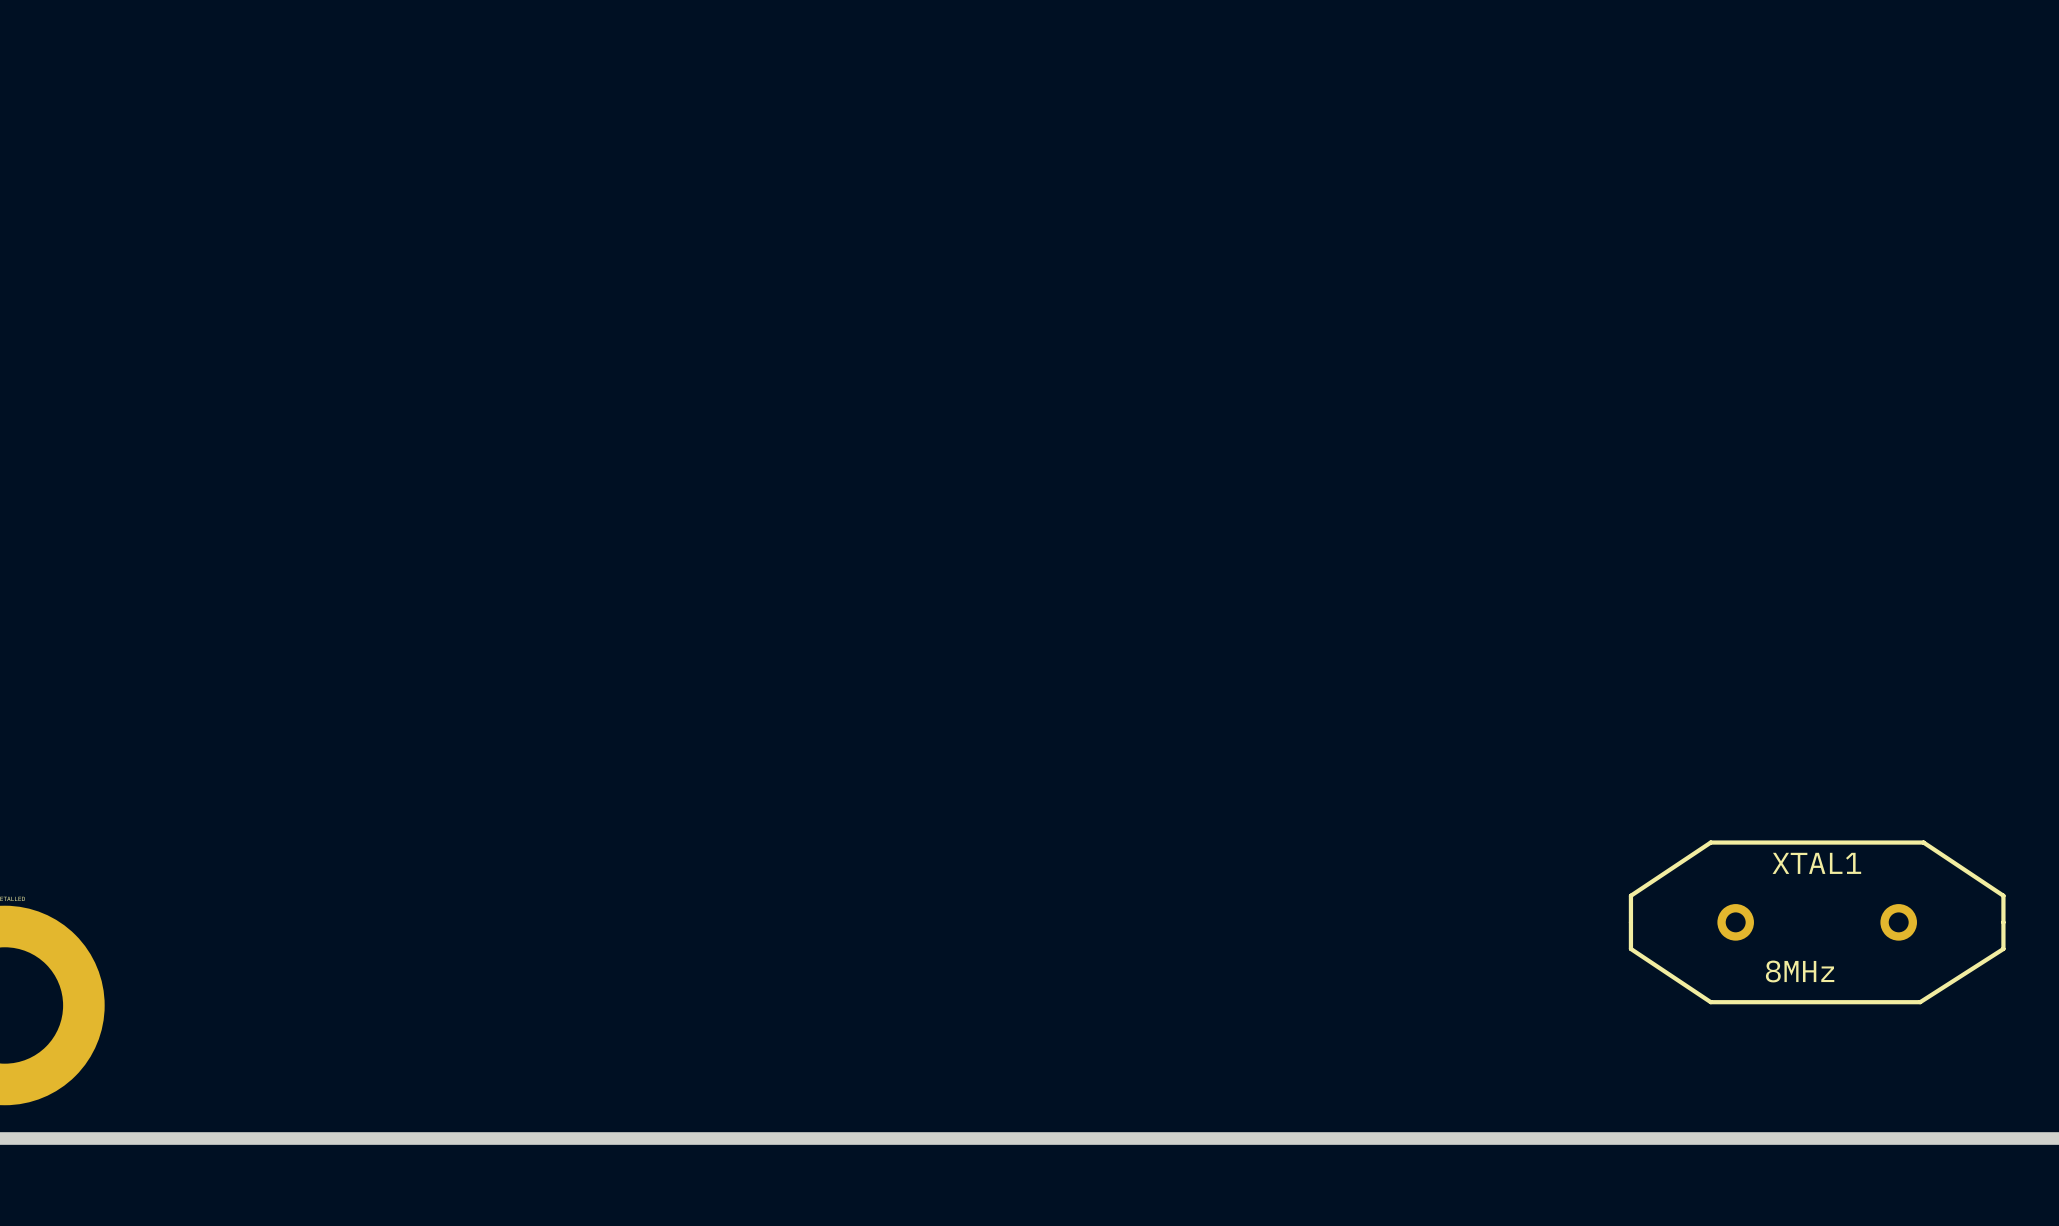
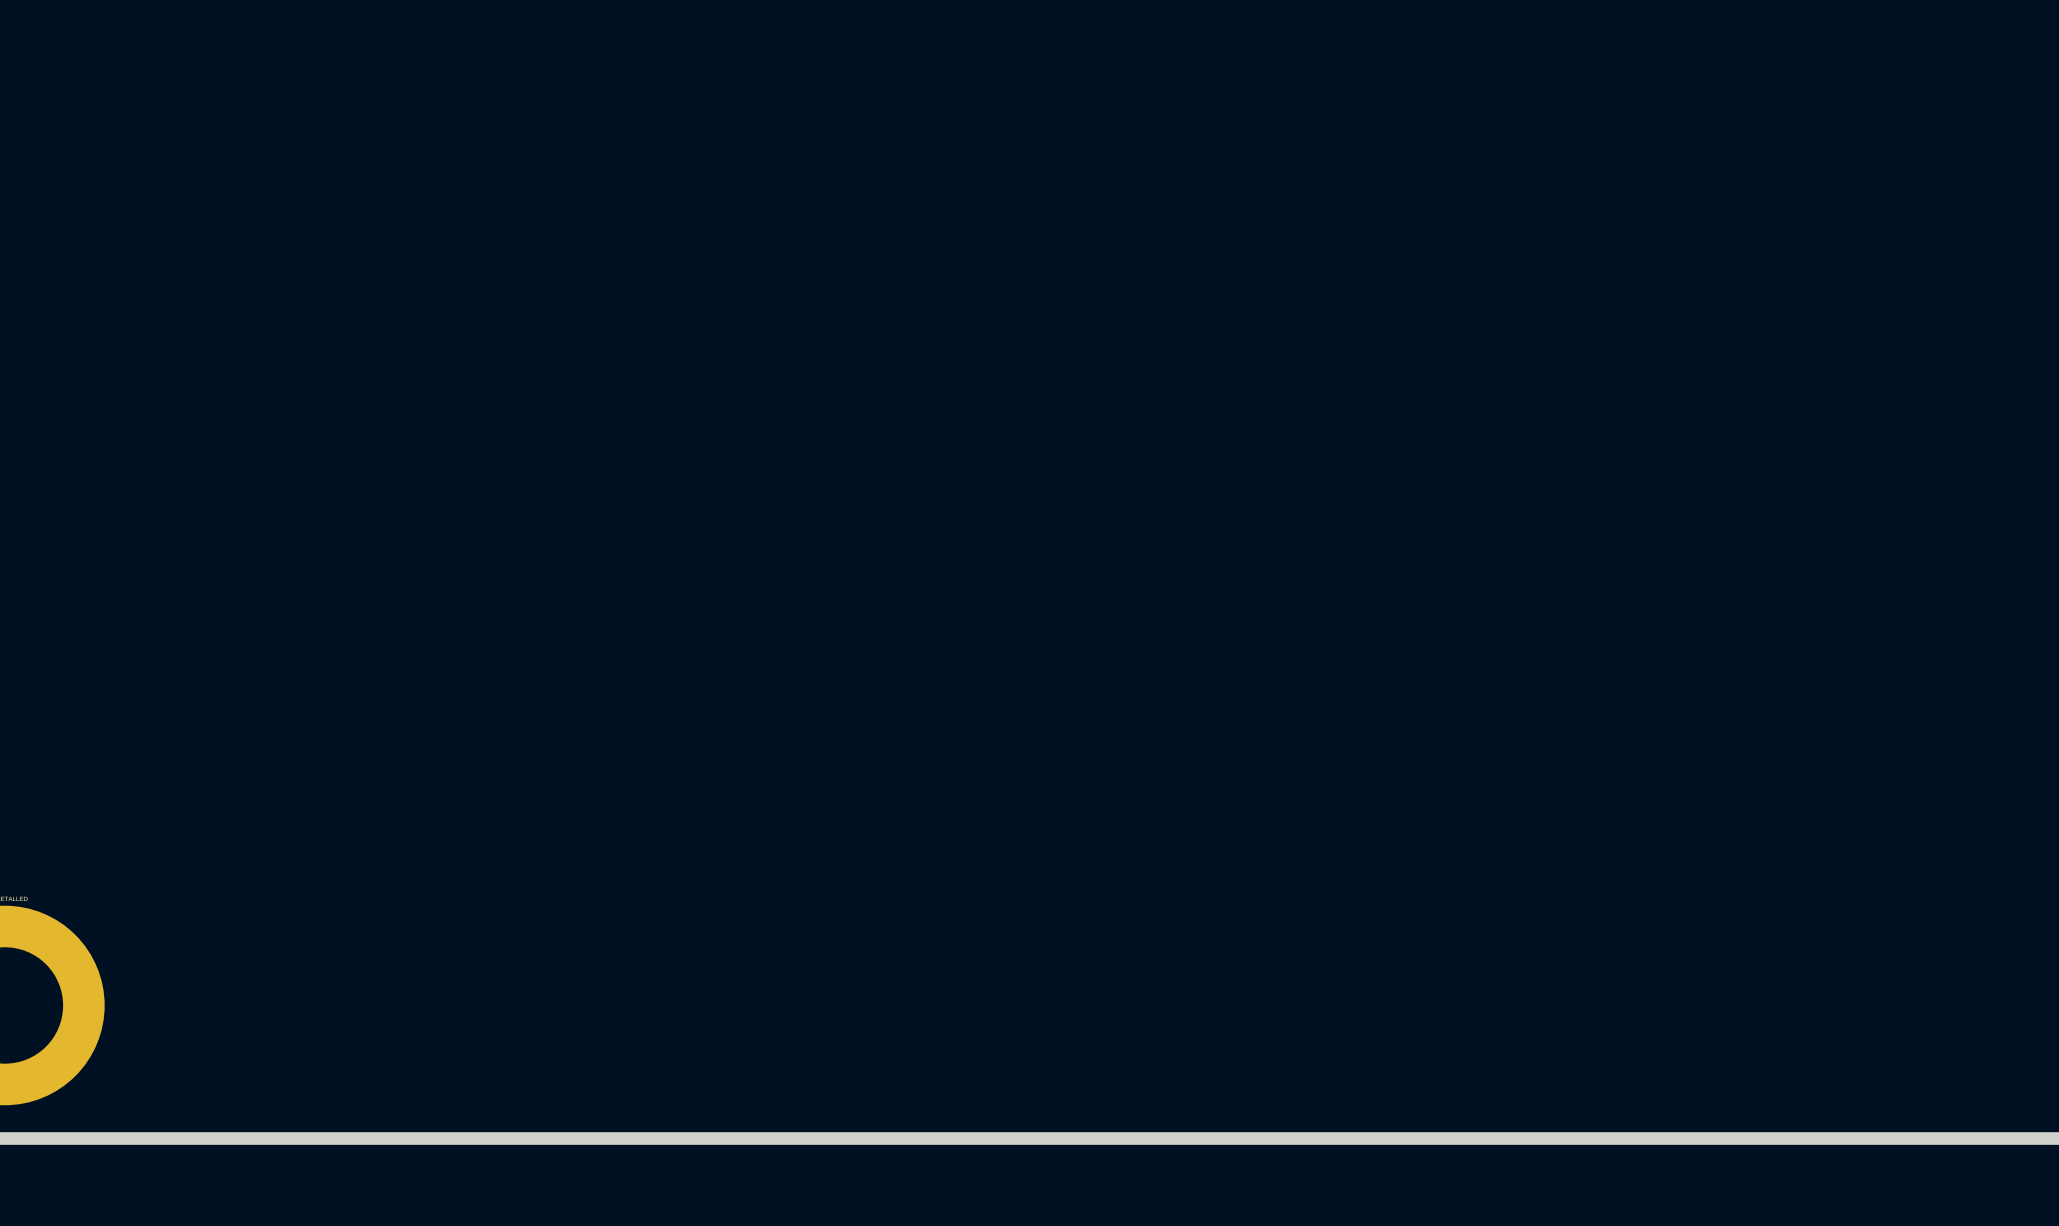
XTAL1: 8MHz (1817, 922) -> none

